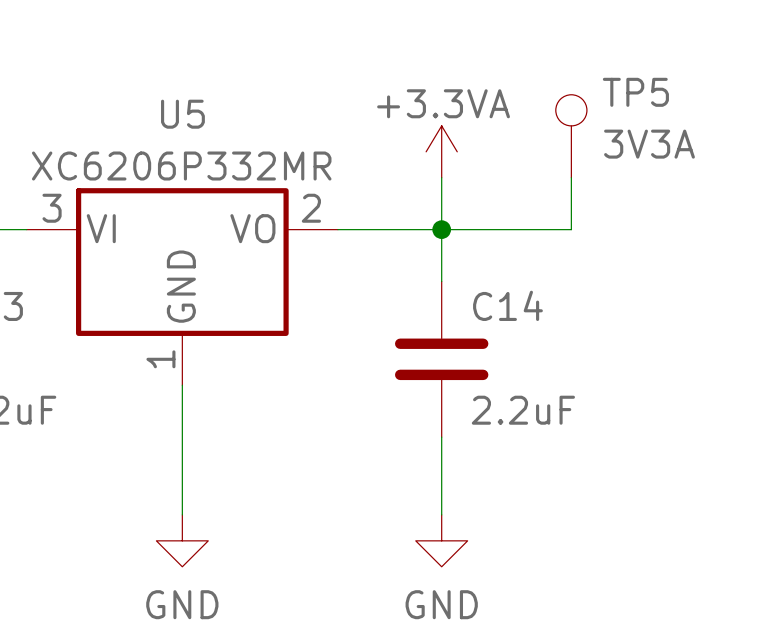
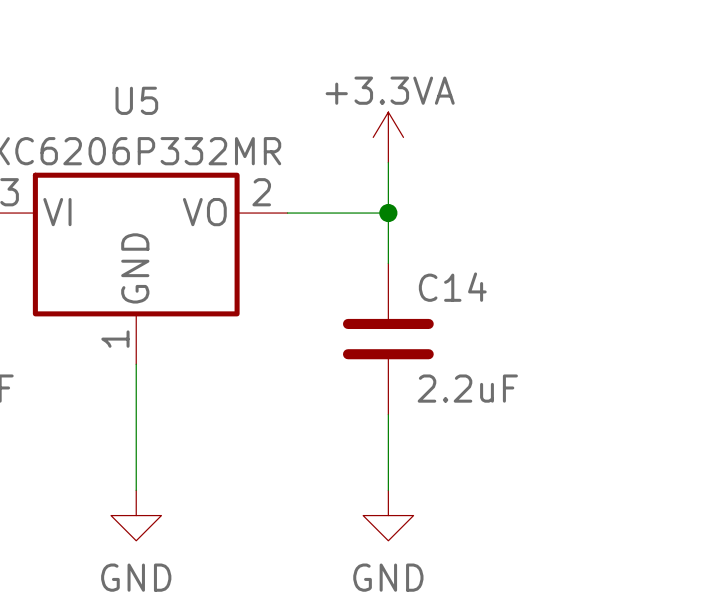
TP5: 3V3A (571, 136) -> none
wire: (571, 177) (571, 229) (441, 229) -> none

